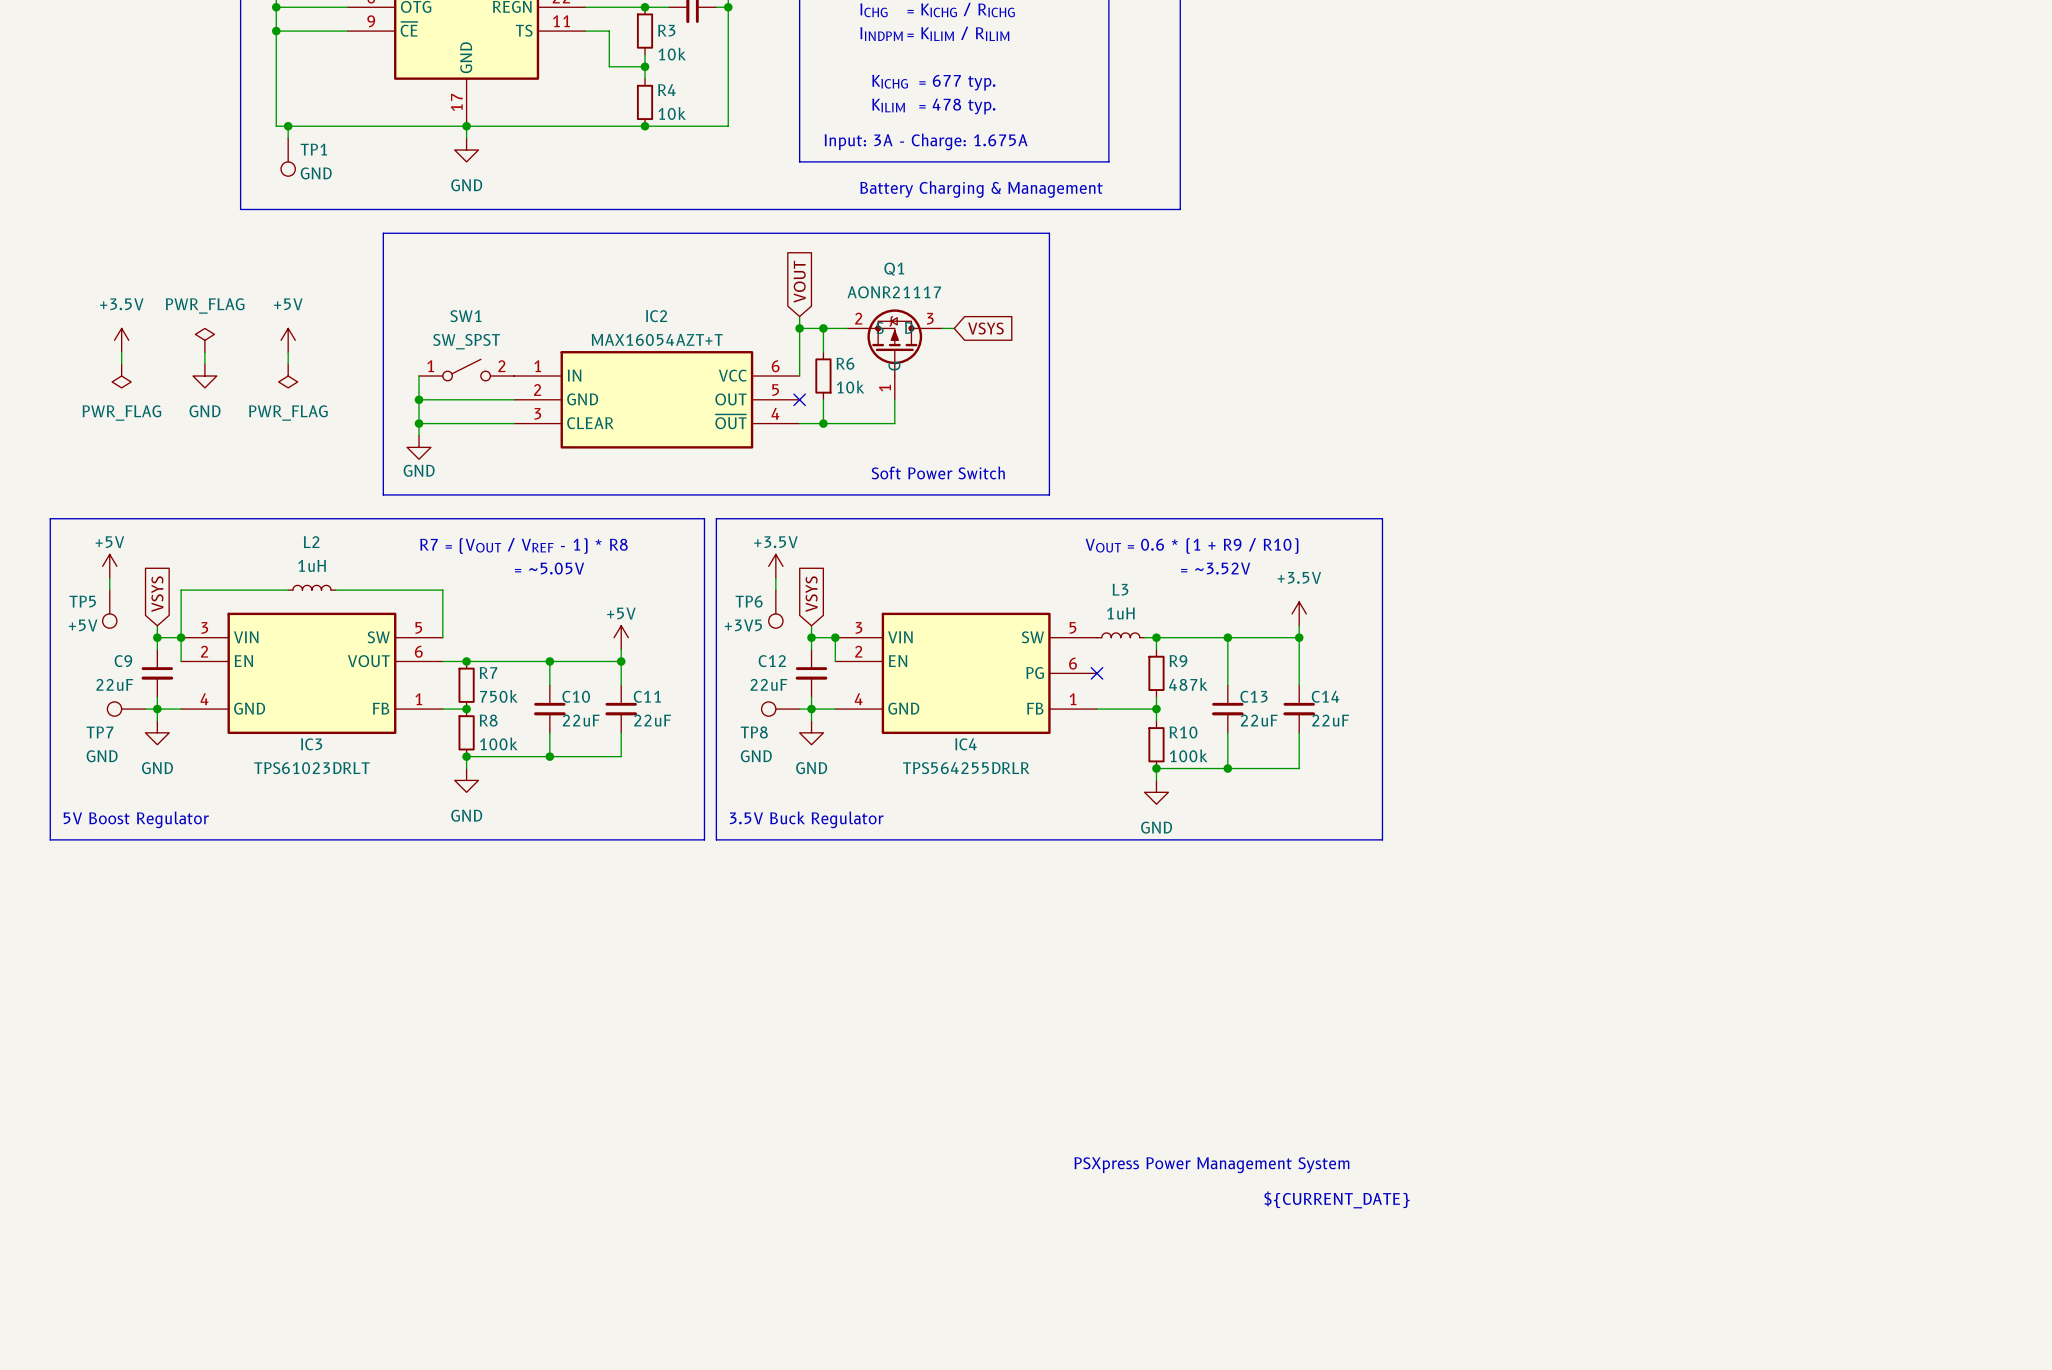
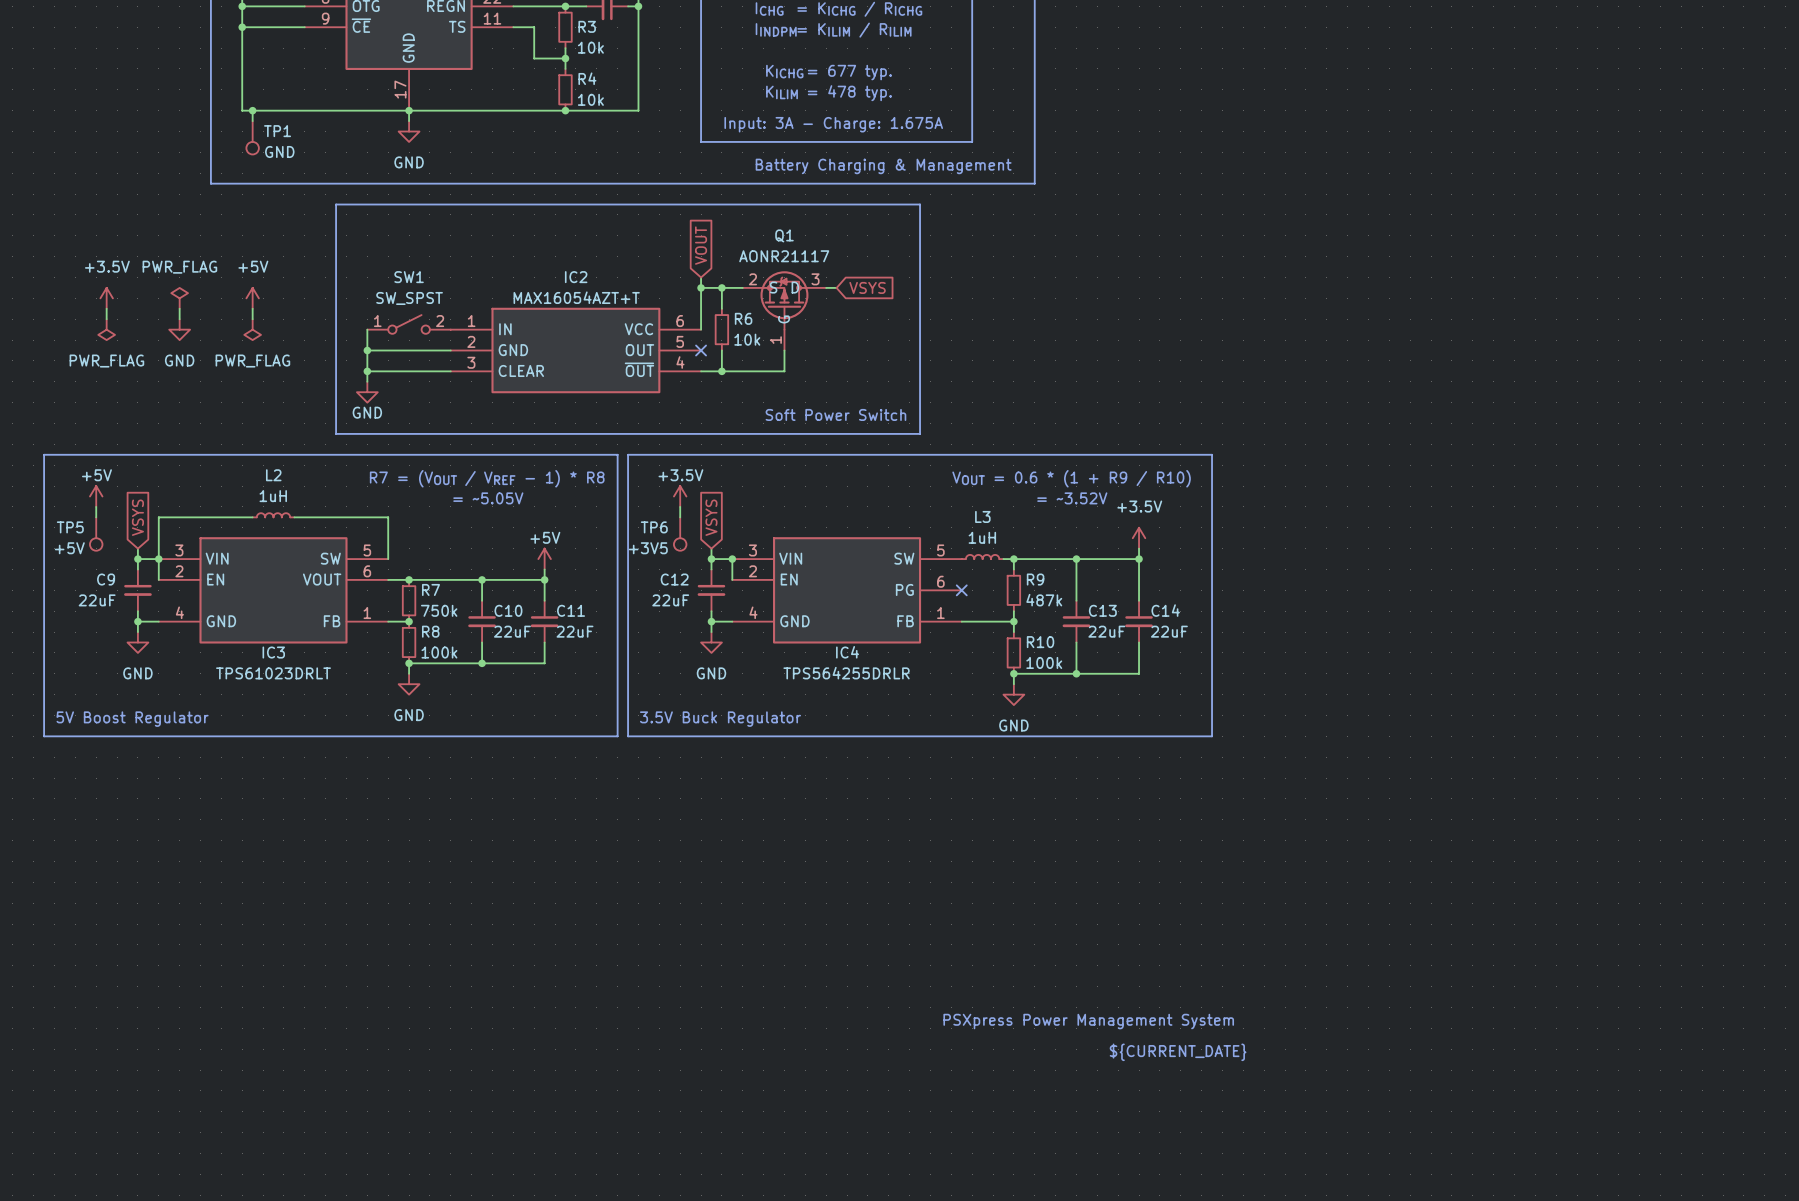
TP7: GND (126, 709) -> none
wire: (145, 709) (157, 709) -> none
TP8: GND (780, 709) -> none
wire: (799, 709) (811, 709) -> none

